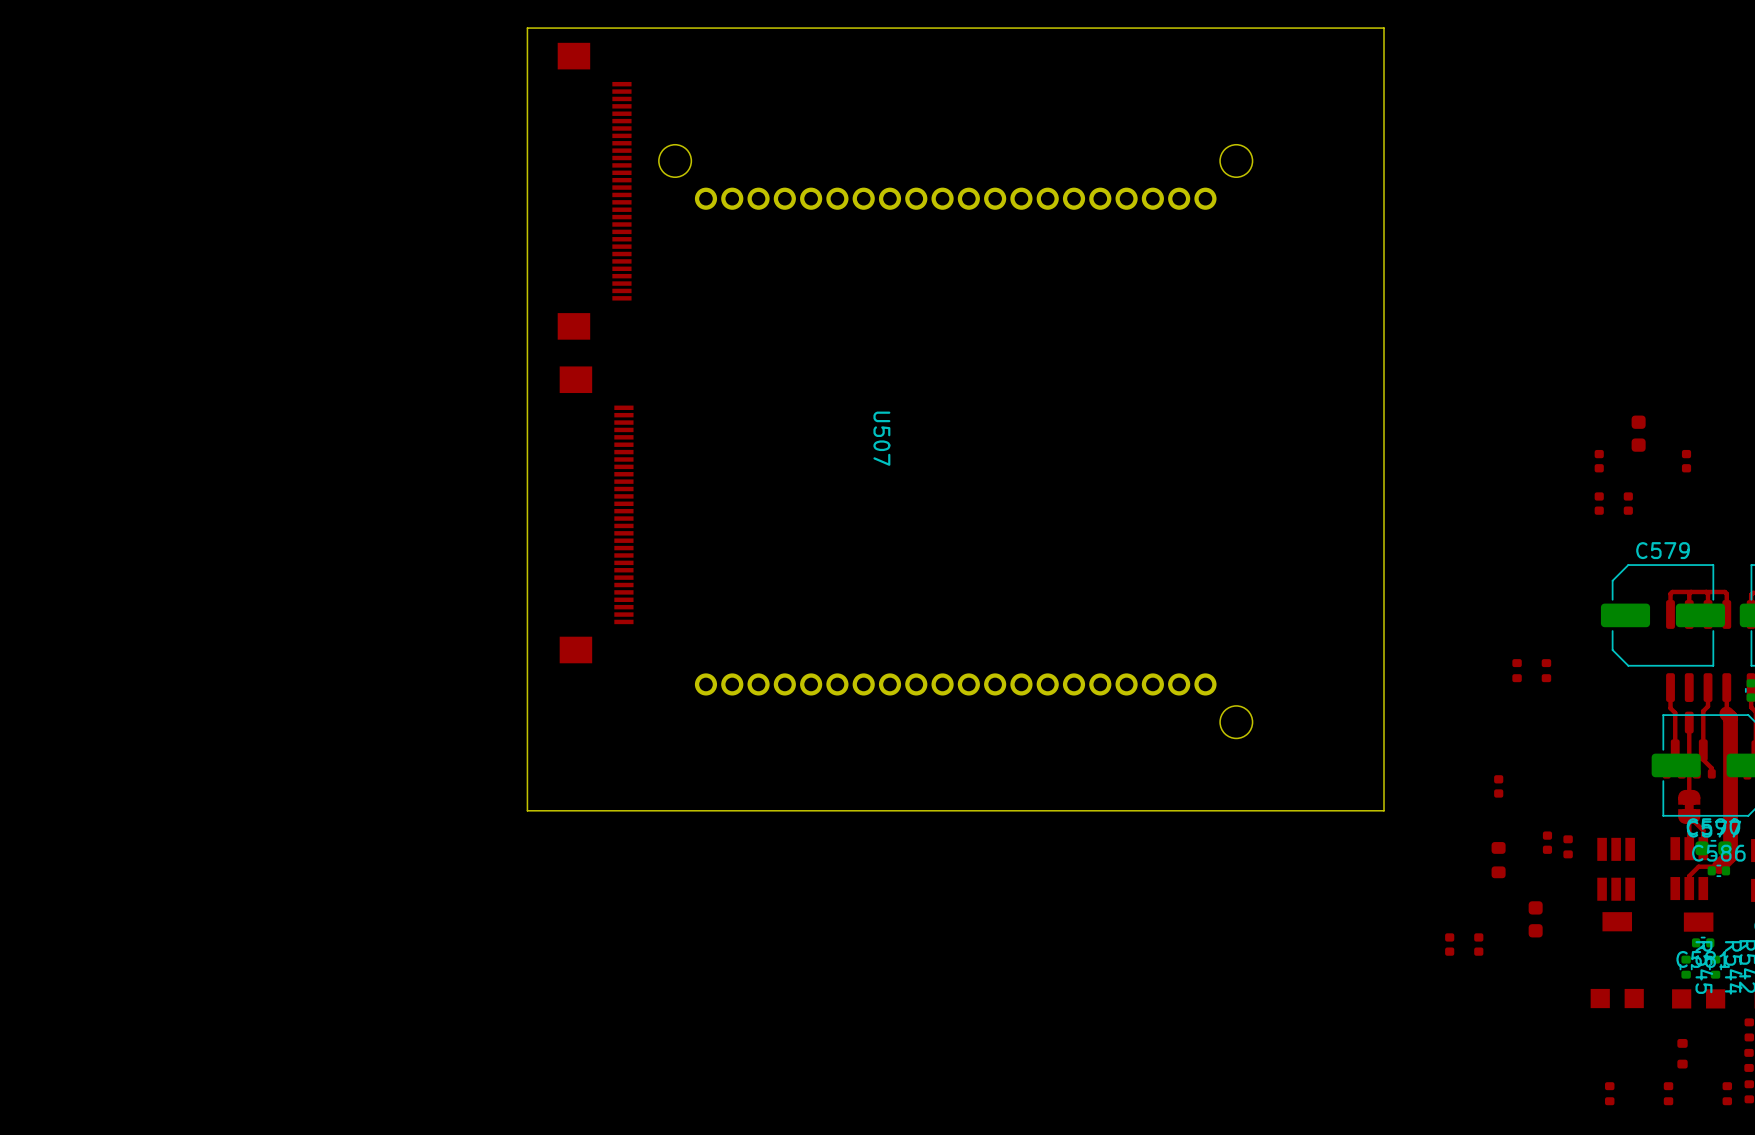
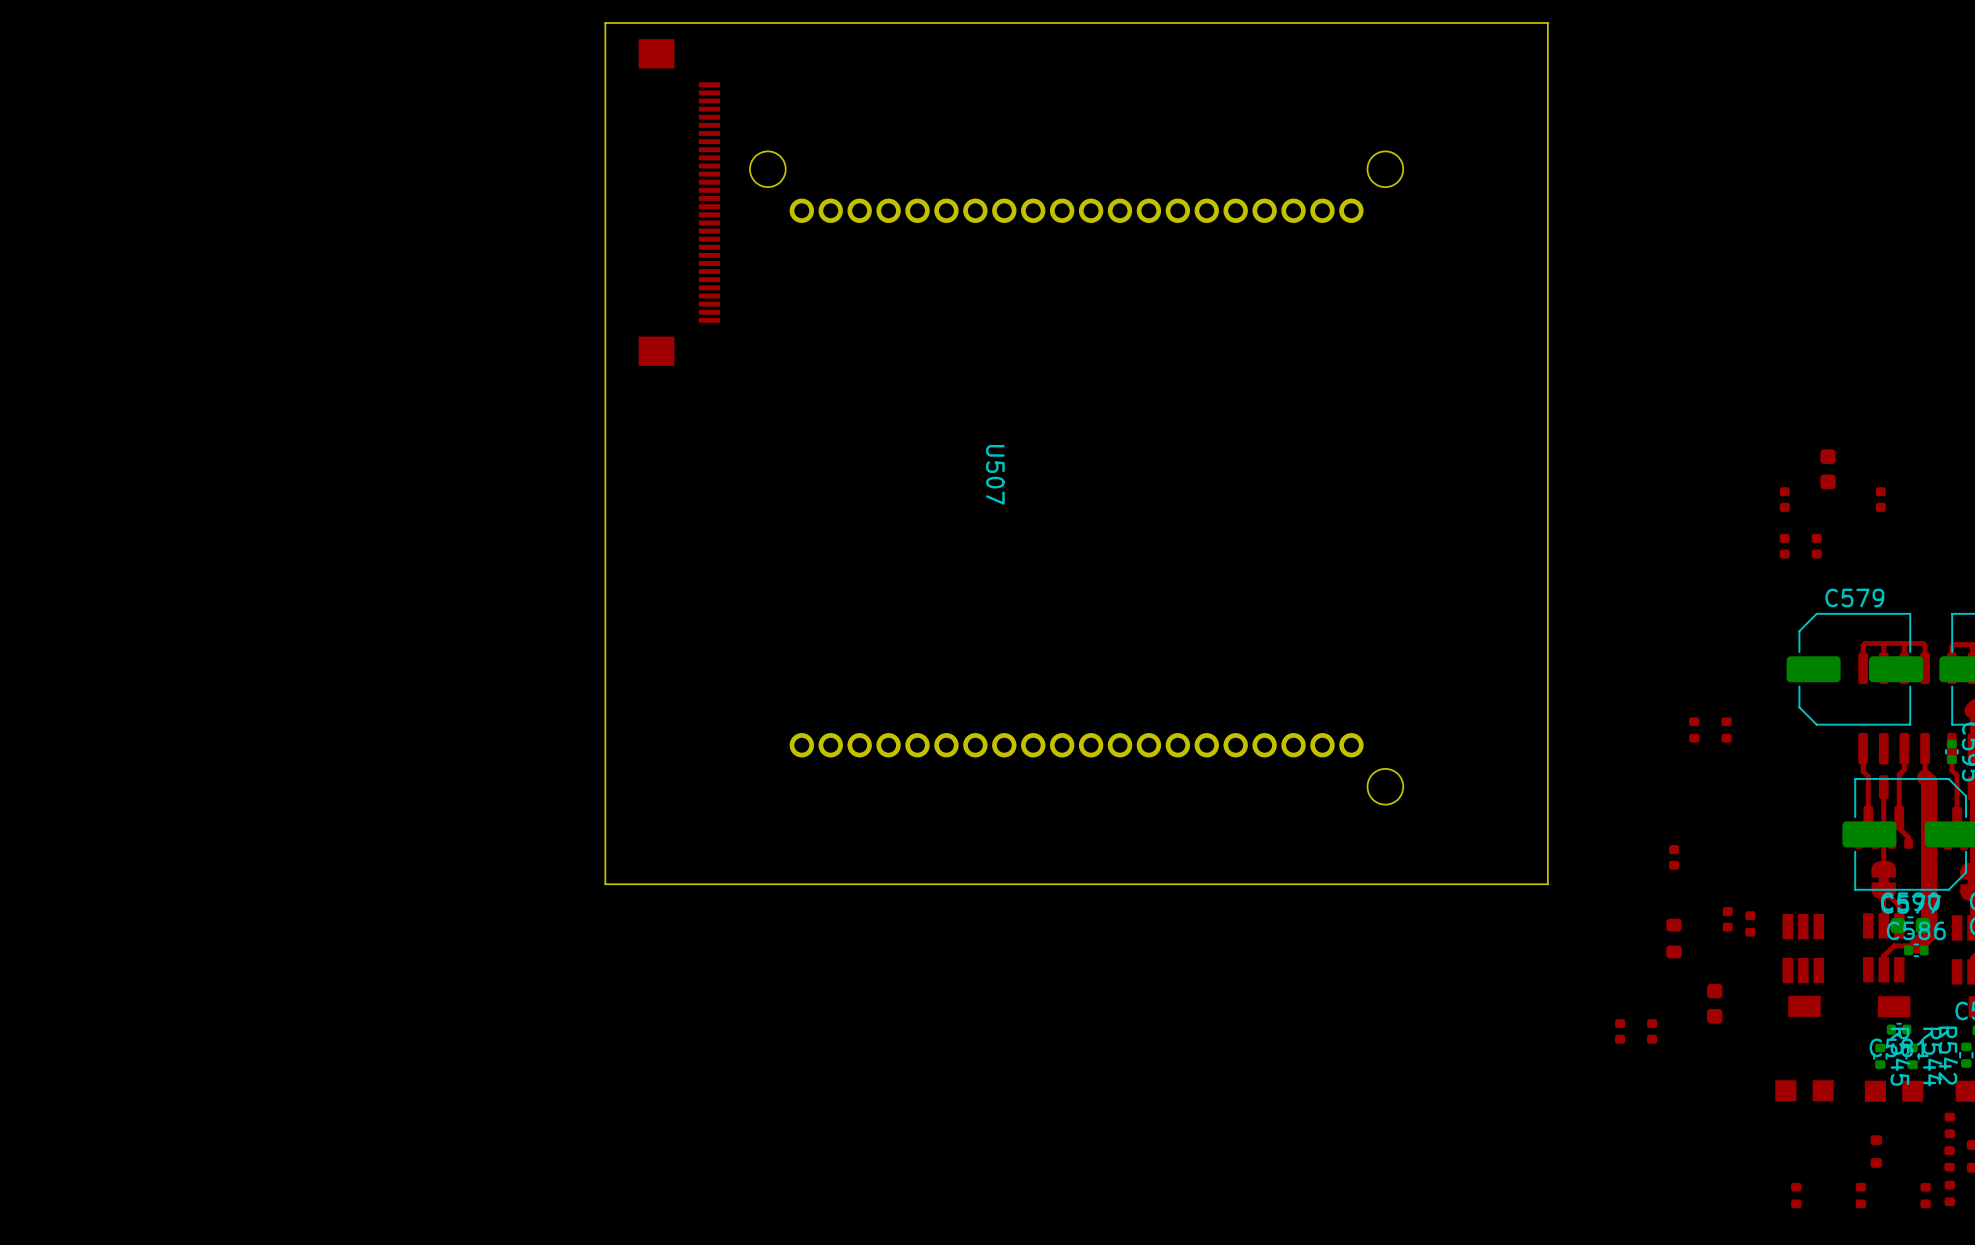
part: (596, 514) -> none

